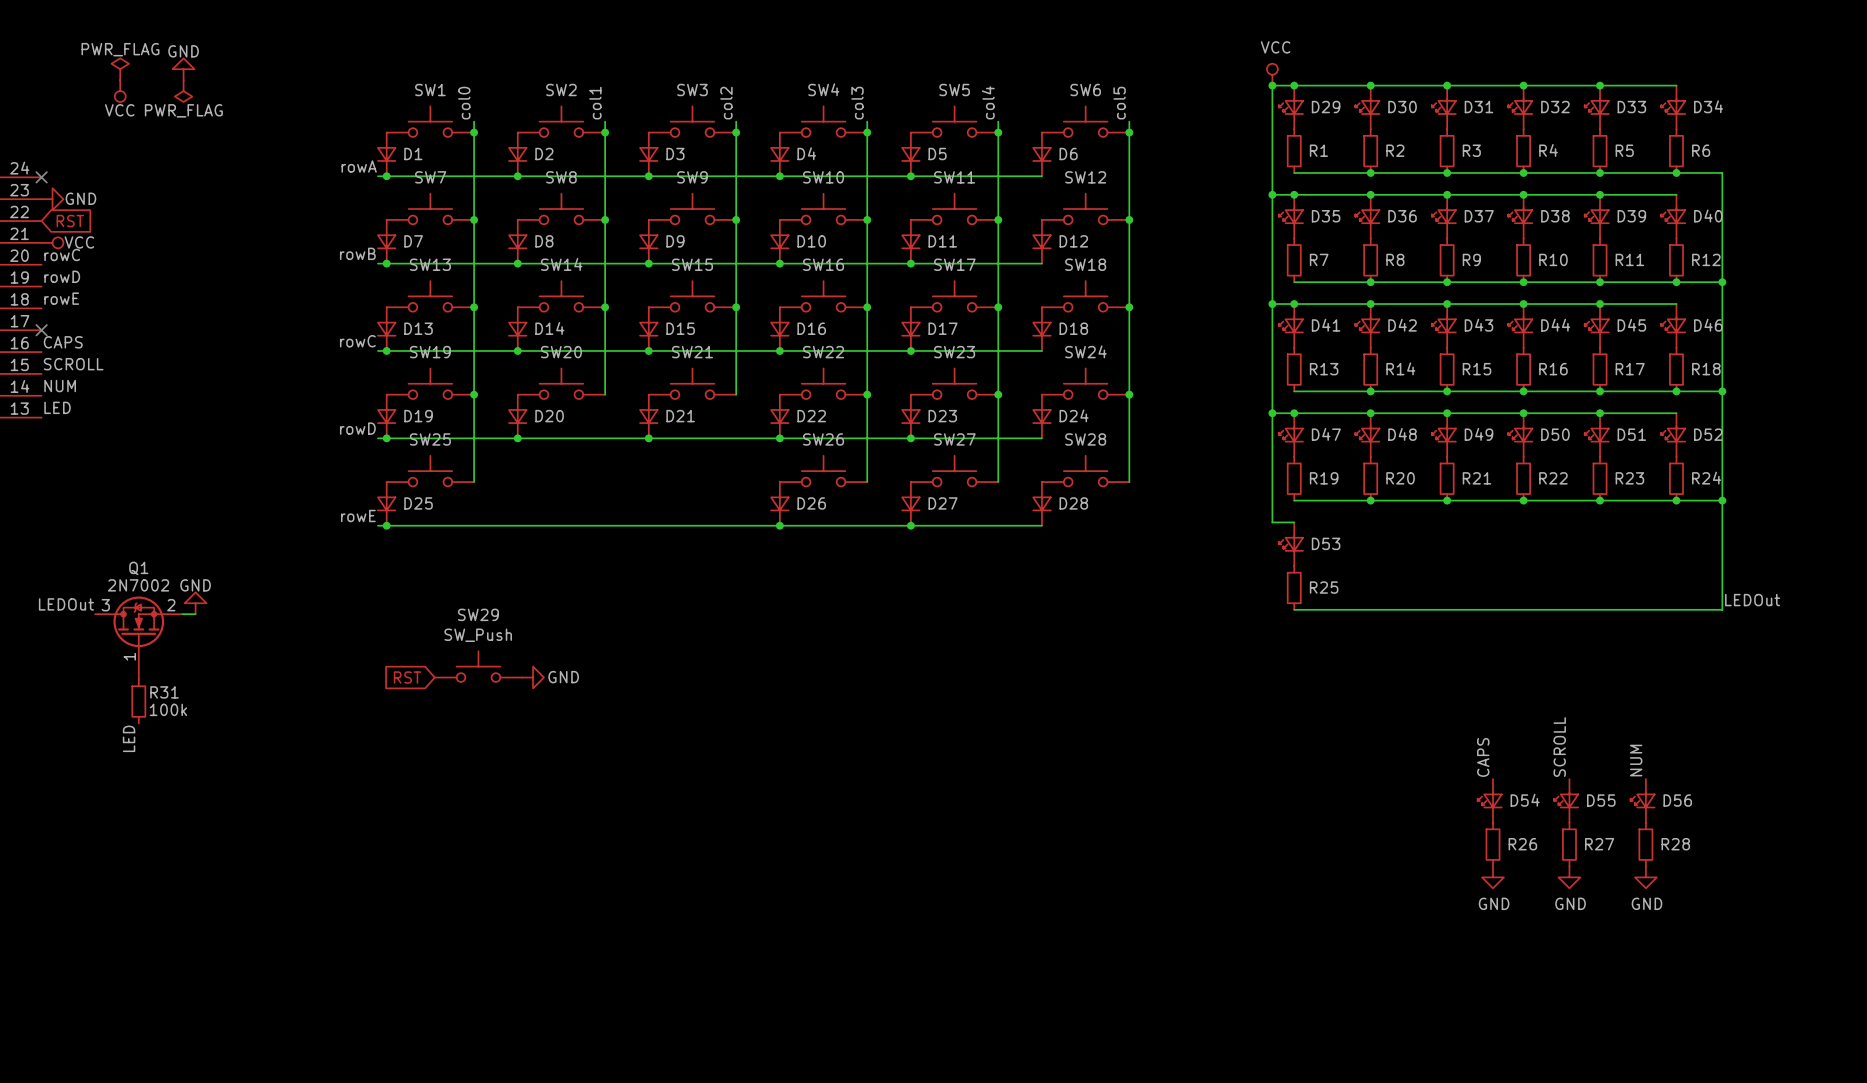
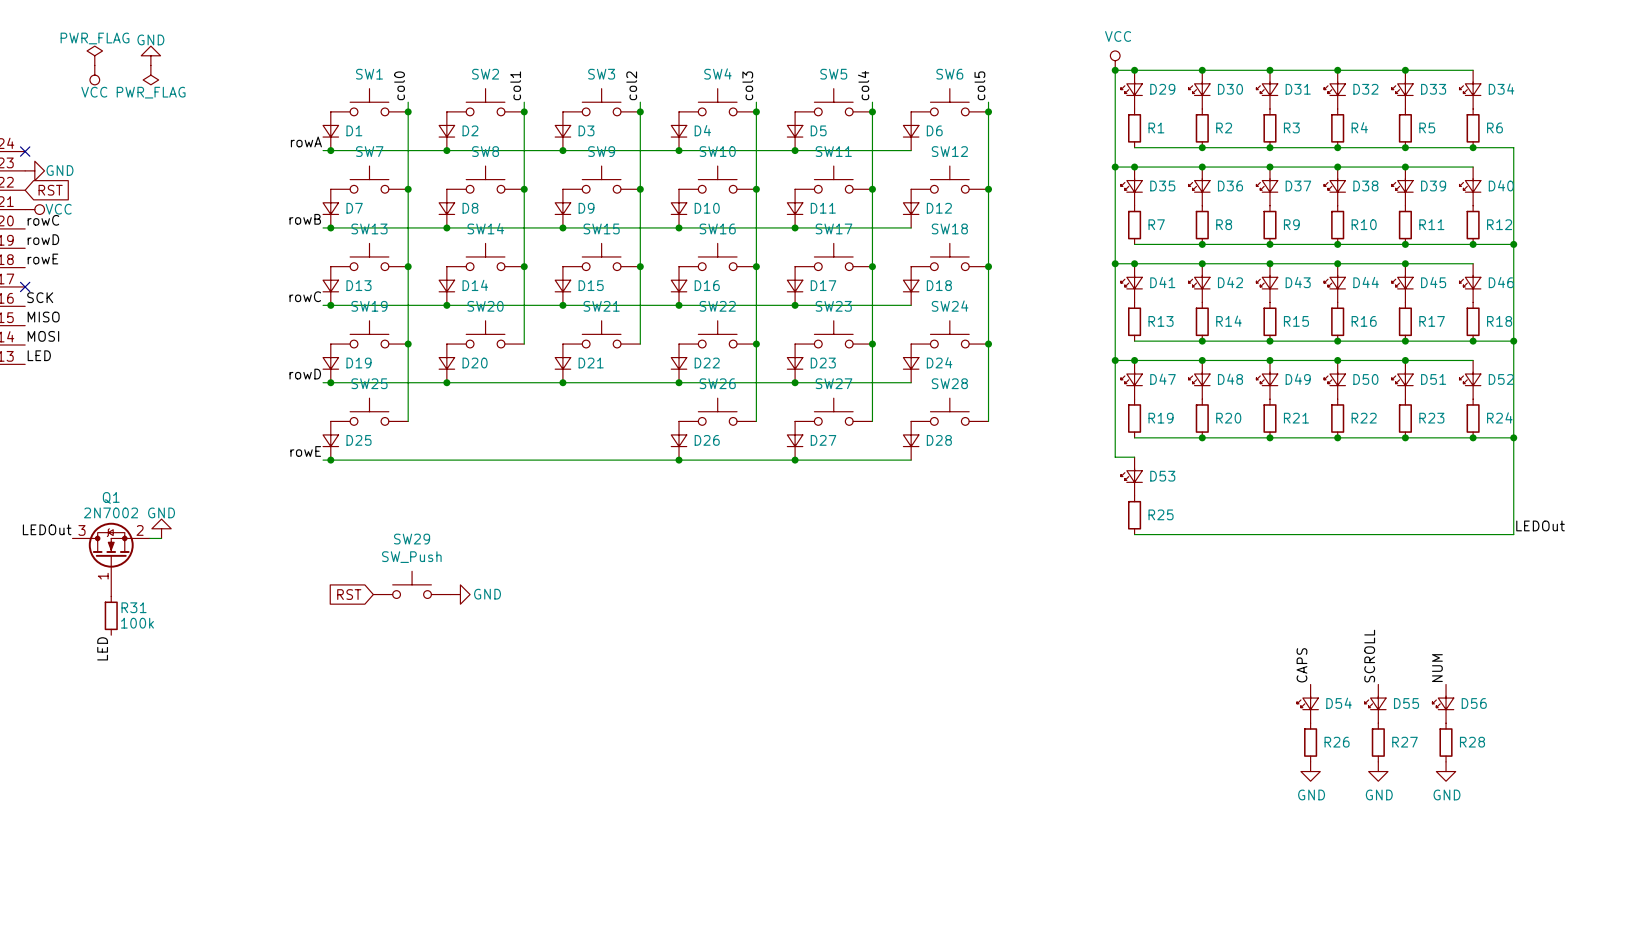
label: CAPS (63, 342) -> SCK (40, 297)
label: SCROLL (73, 364) -> MISO (43, 317)
label: NUM (60, 386) -> MOSI (43, 336)

